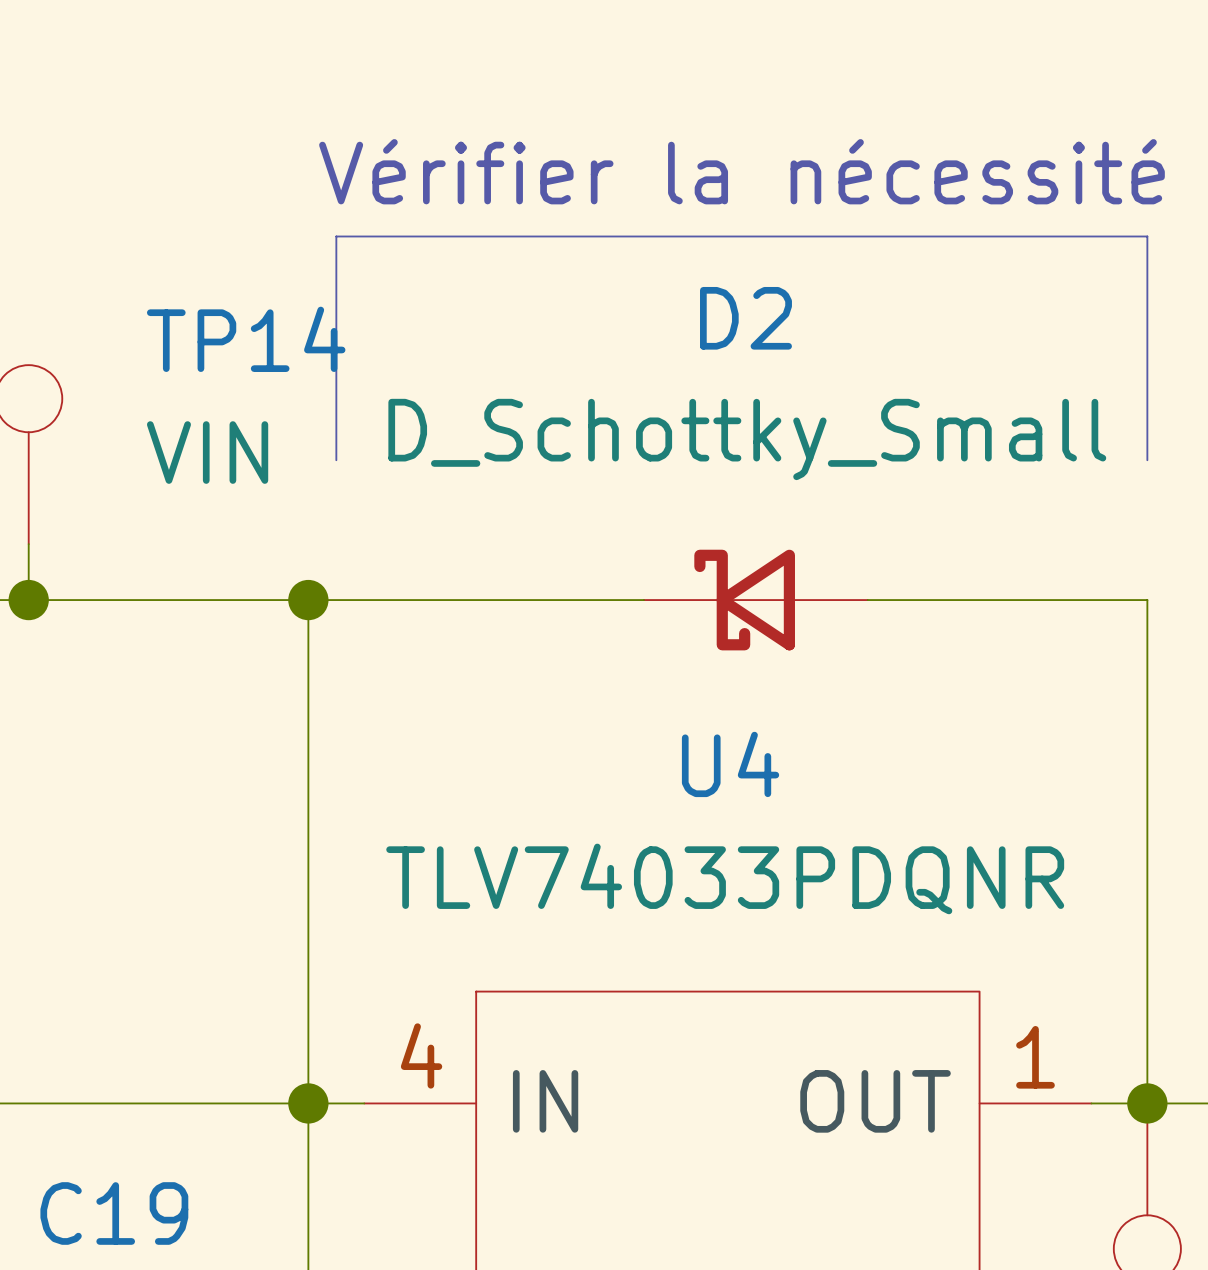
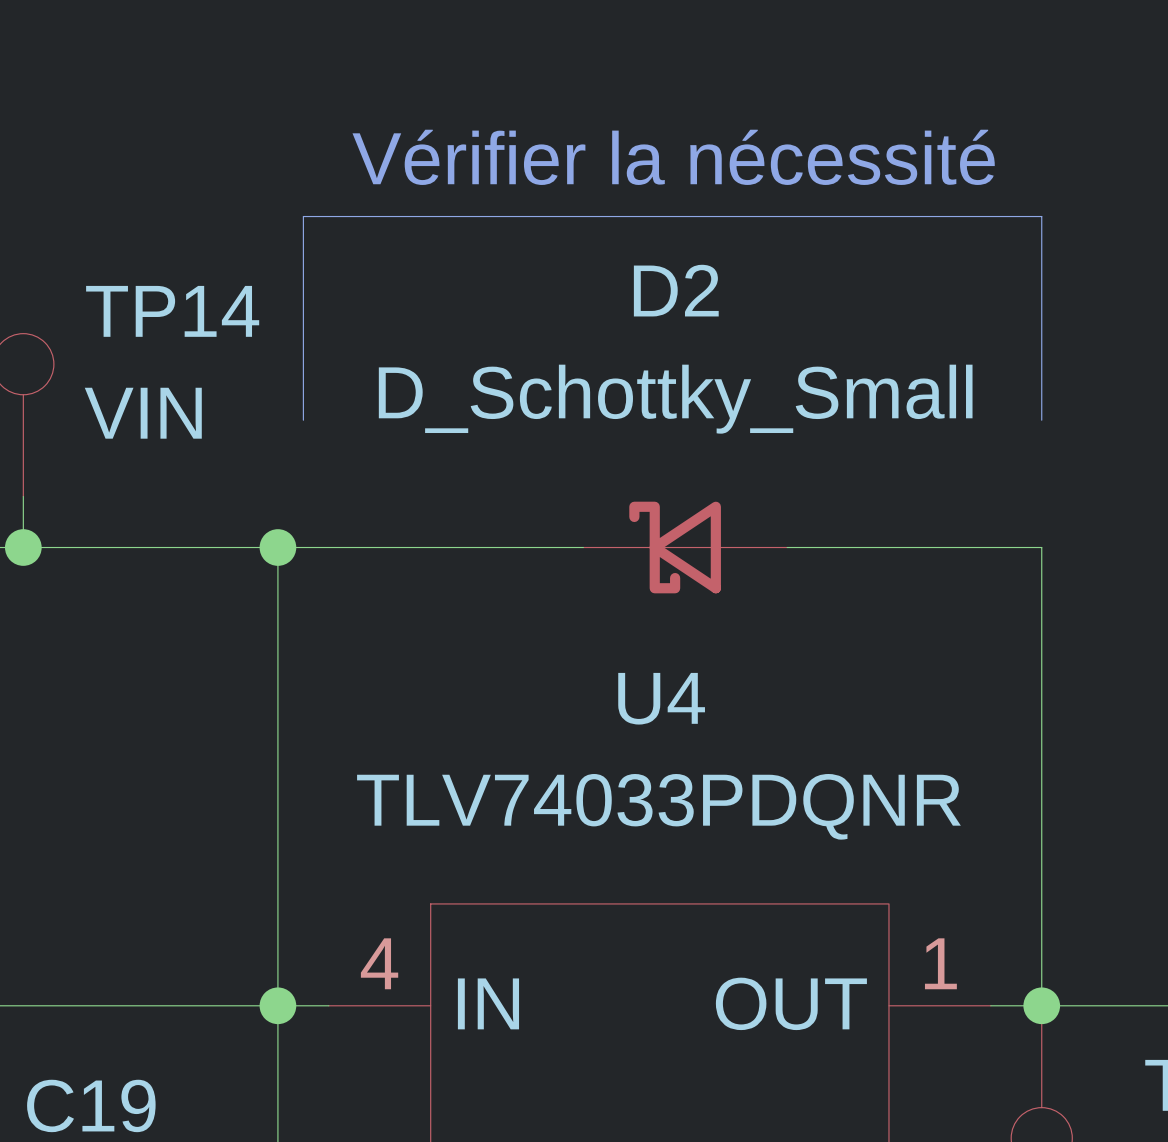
TP14 name position: TP14 (246, 339) -> TP14 (172, 311)
TP14 value position: VIN (207, 452) -> VIN (143, 413)

